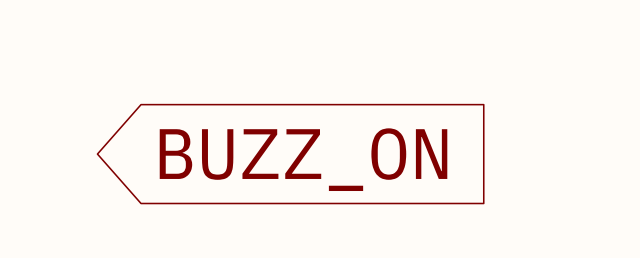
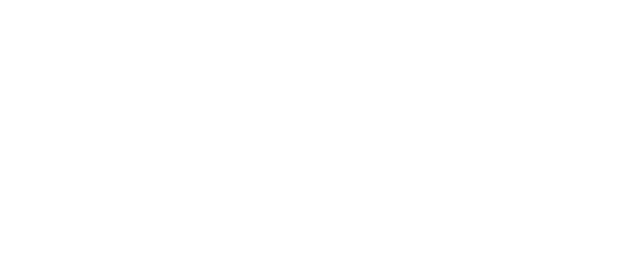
global label: BUZZ_ON (303, 159) -> none

